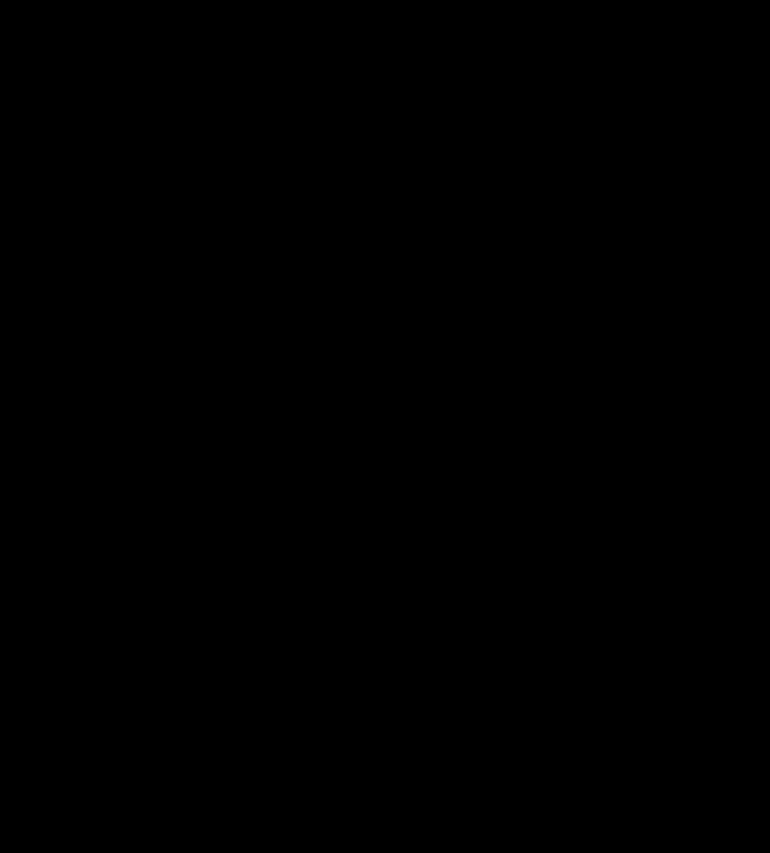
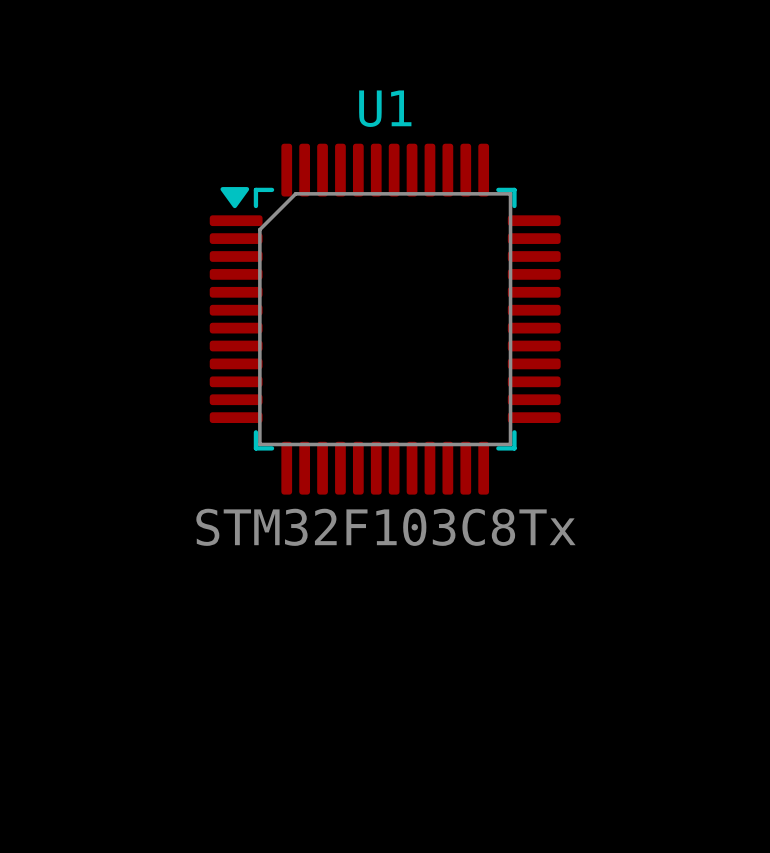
U1: none -> STM32F103C8Tx (385, 319)

